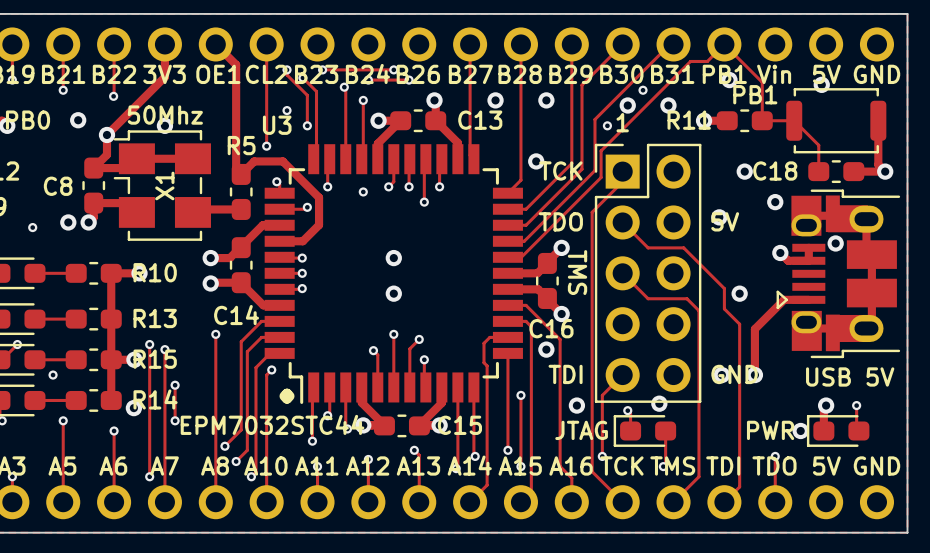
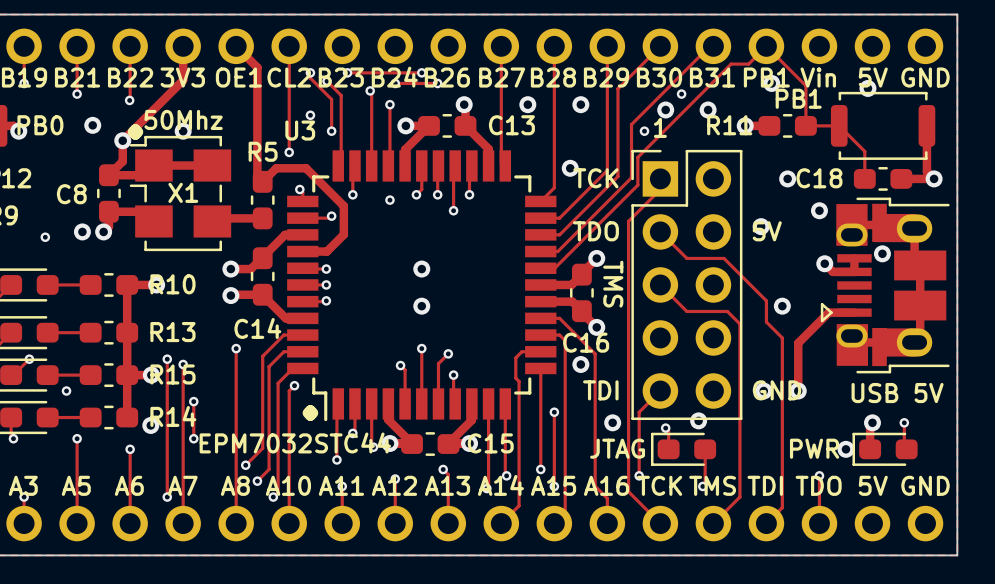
text: none -> . (135, 131)
X1 name rotation: 0° (164, 185) -> 90° clockwise (183, 192)

